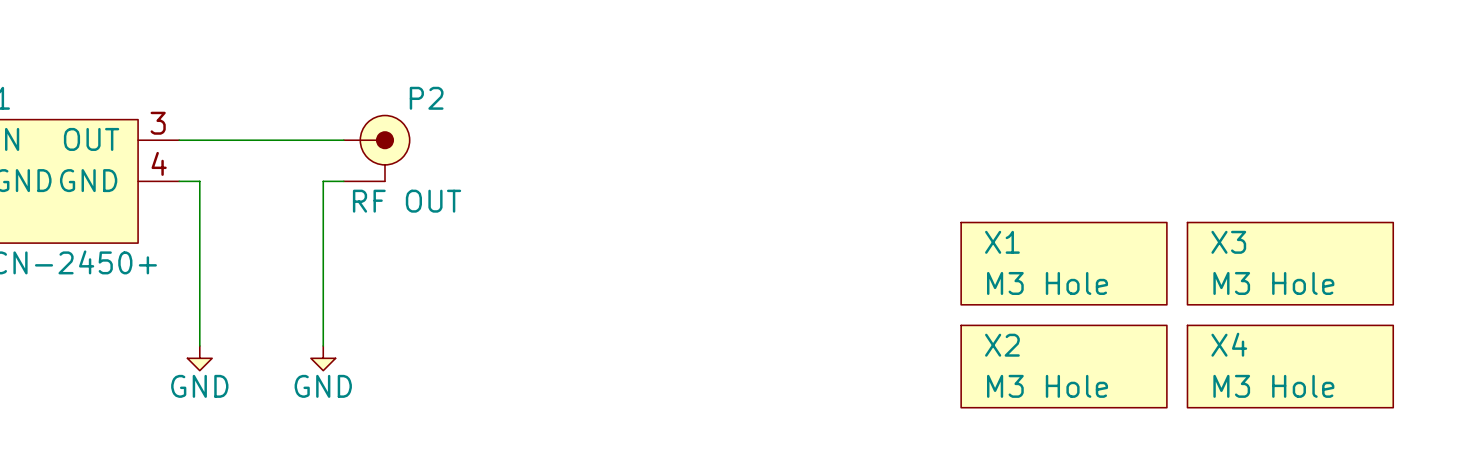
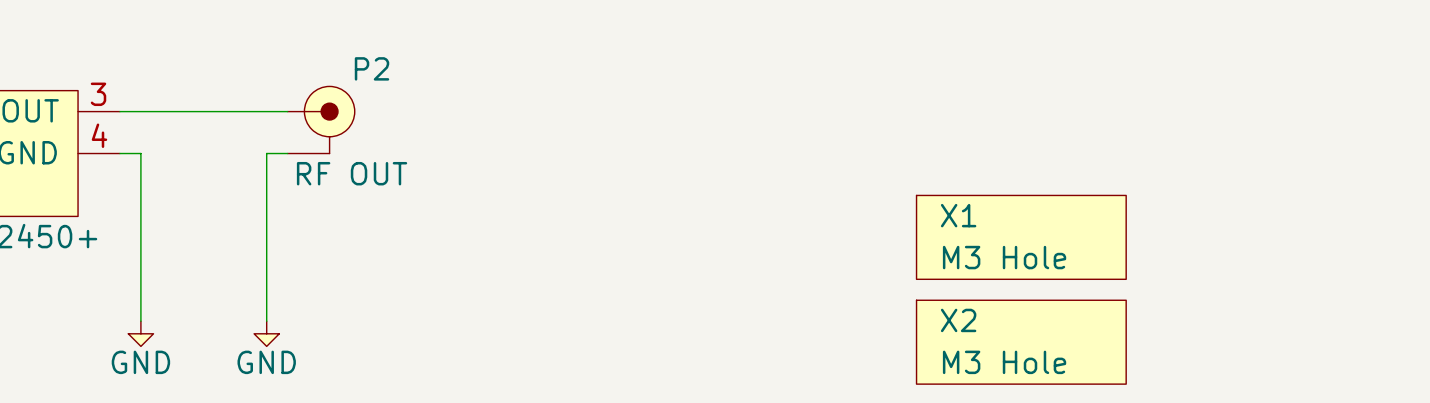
X3: M3 Hole (1290, 263) -> none
X4: M3 Hole (1290, 366) -> none

